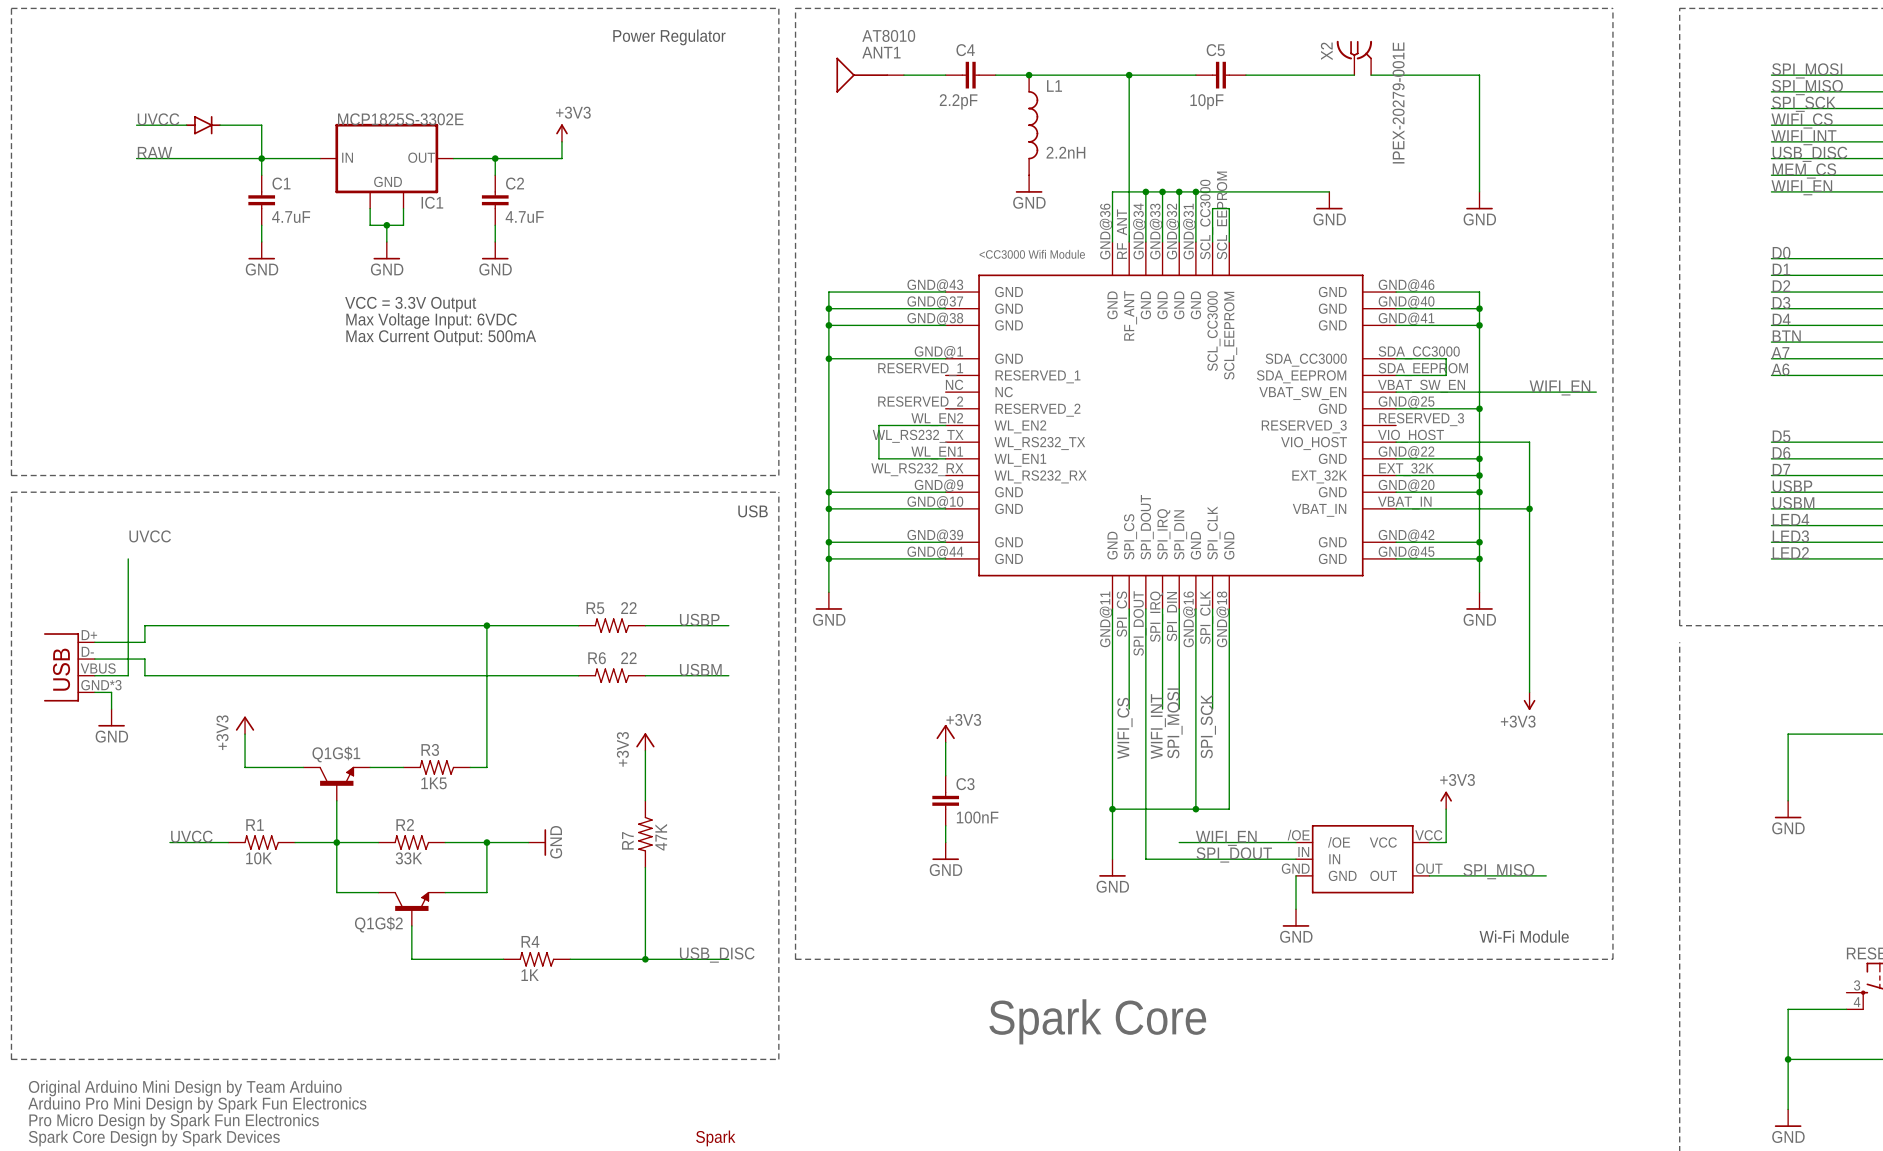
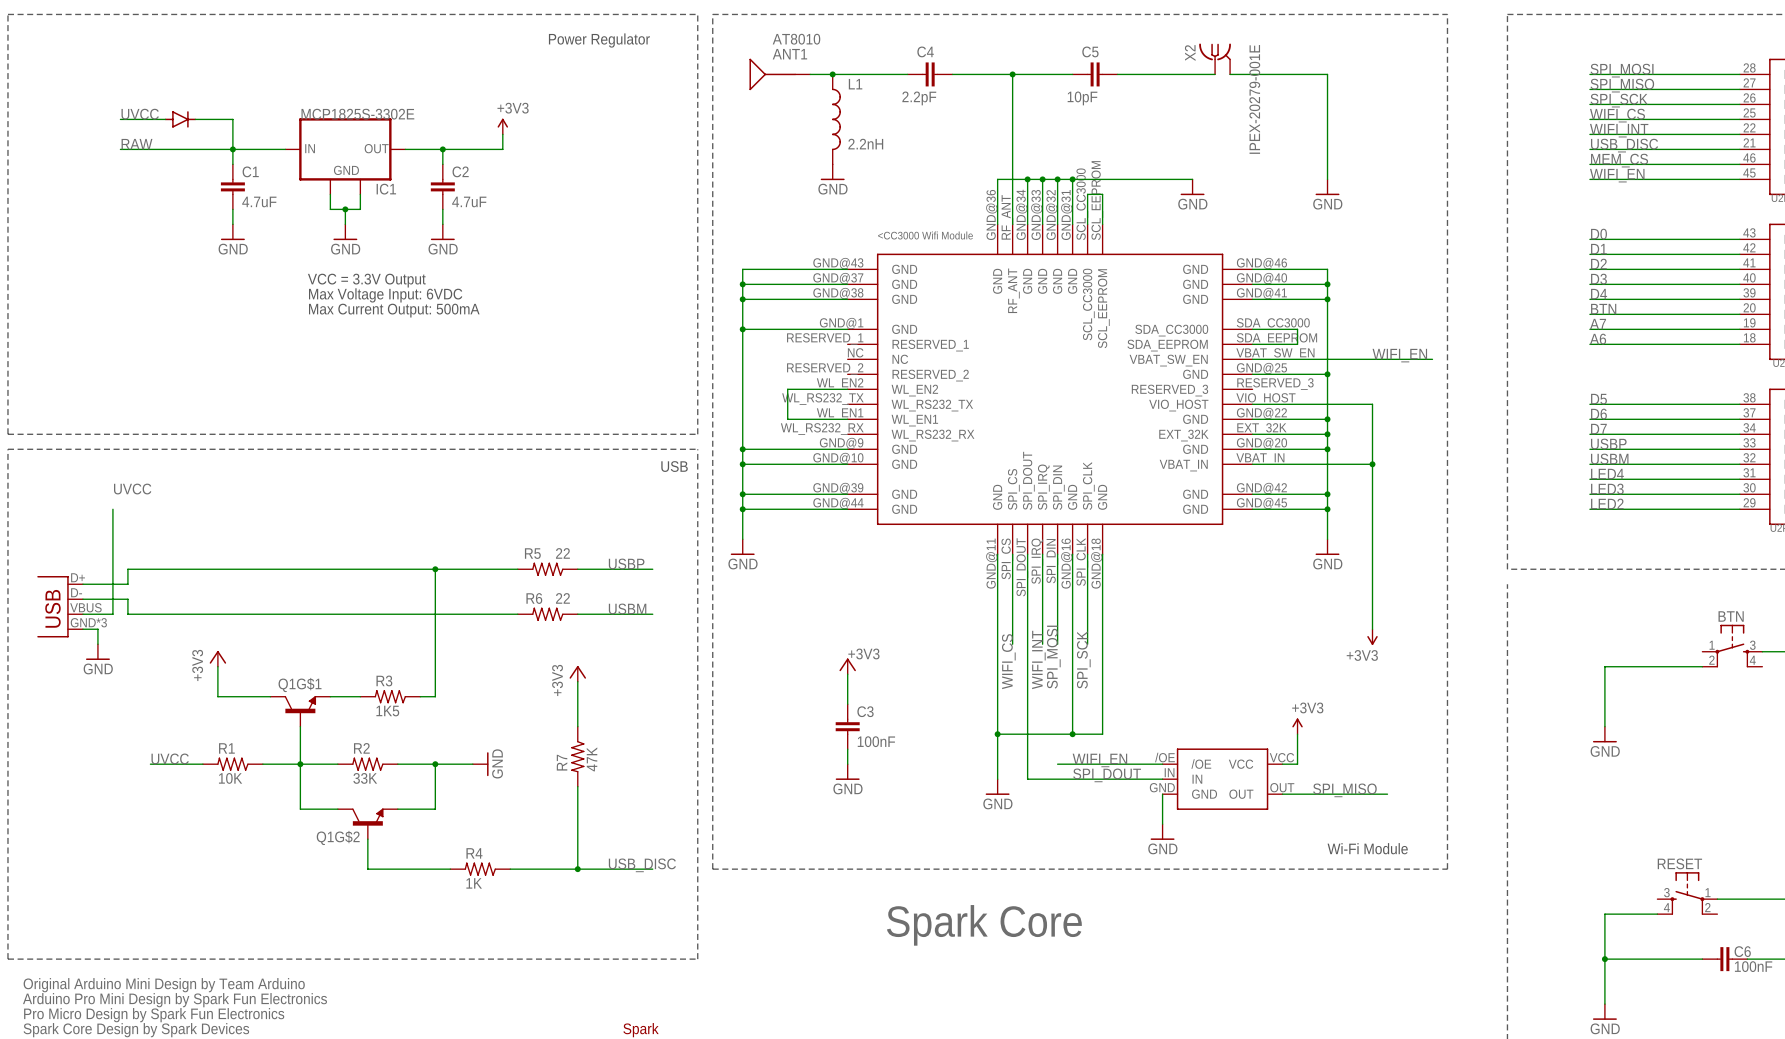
junction: none -> (832, 74)
C4 position: (970, 75) -> (930, 74)
junction: (1029, 75) -> none
L1 position: (1033, 125) -> (836, 119)
power symbol position: GND (1029, 184) -> GND (832, 172)

